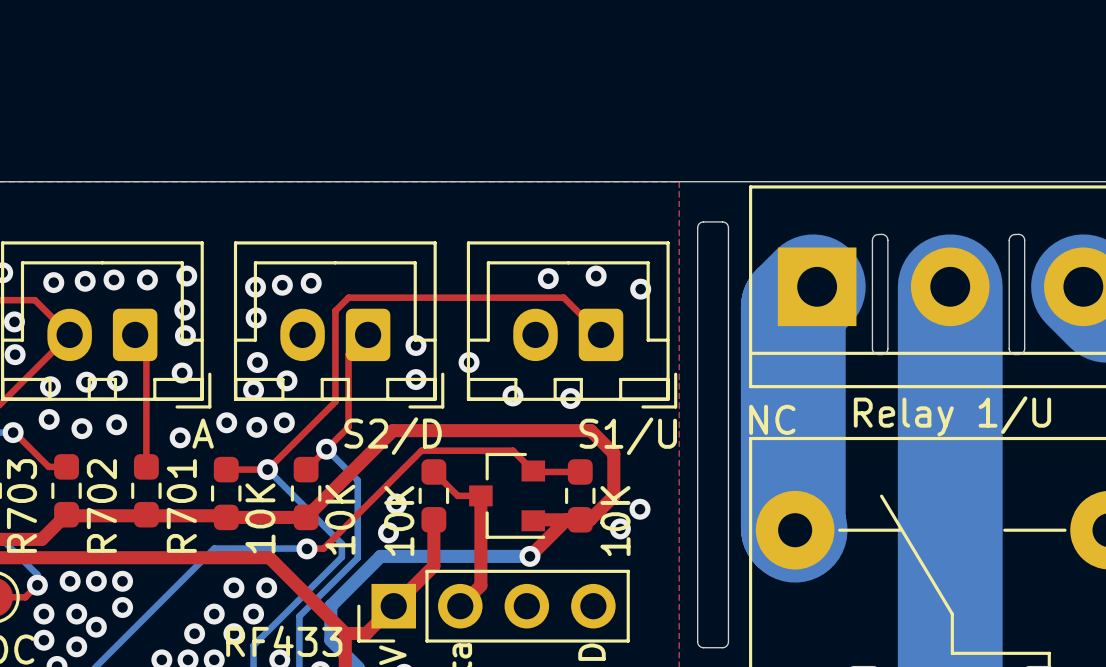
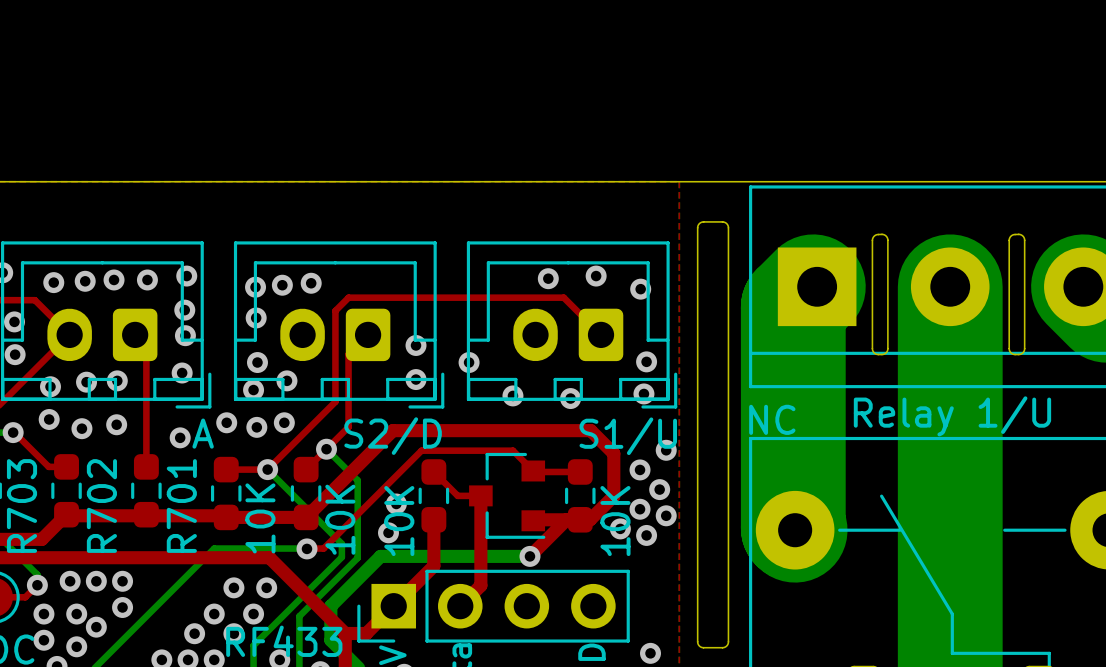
via: none -> (646, 361)
via: none -> (643, 393)
via: none -> (666, 450)
via: none -> (640, 469)
via: none -> (659, 489)
via: none -> (666, 515)
via: none -> (646, 535)
via: none -> (650, 653)

